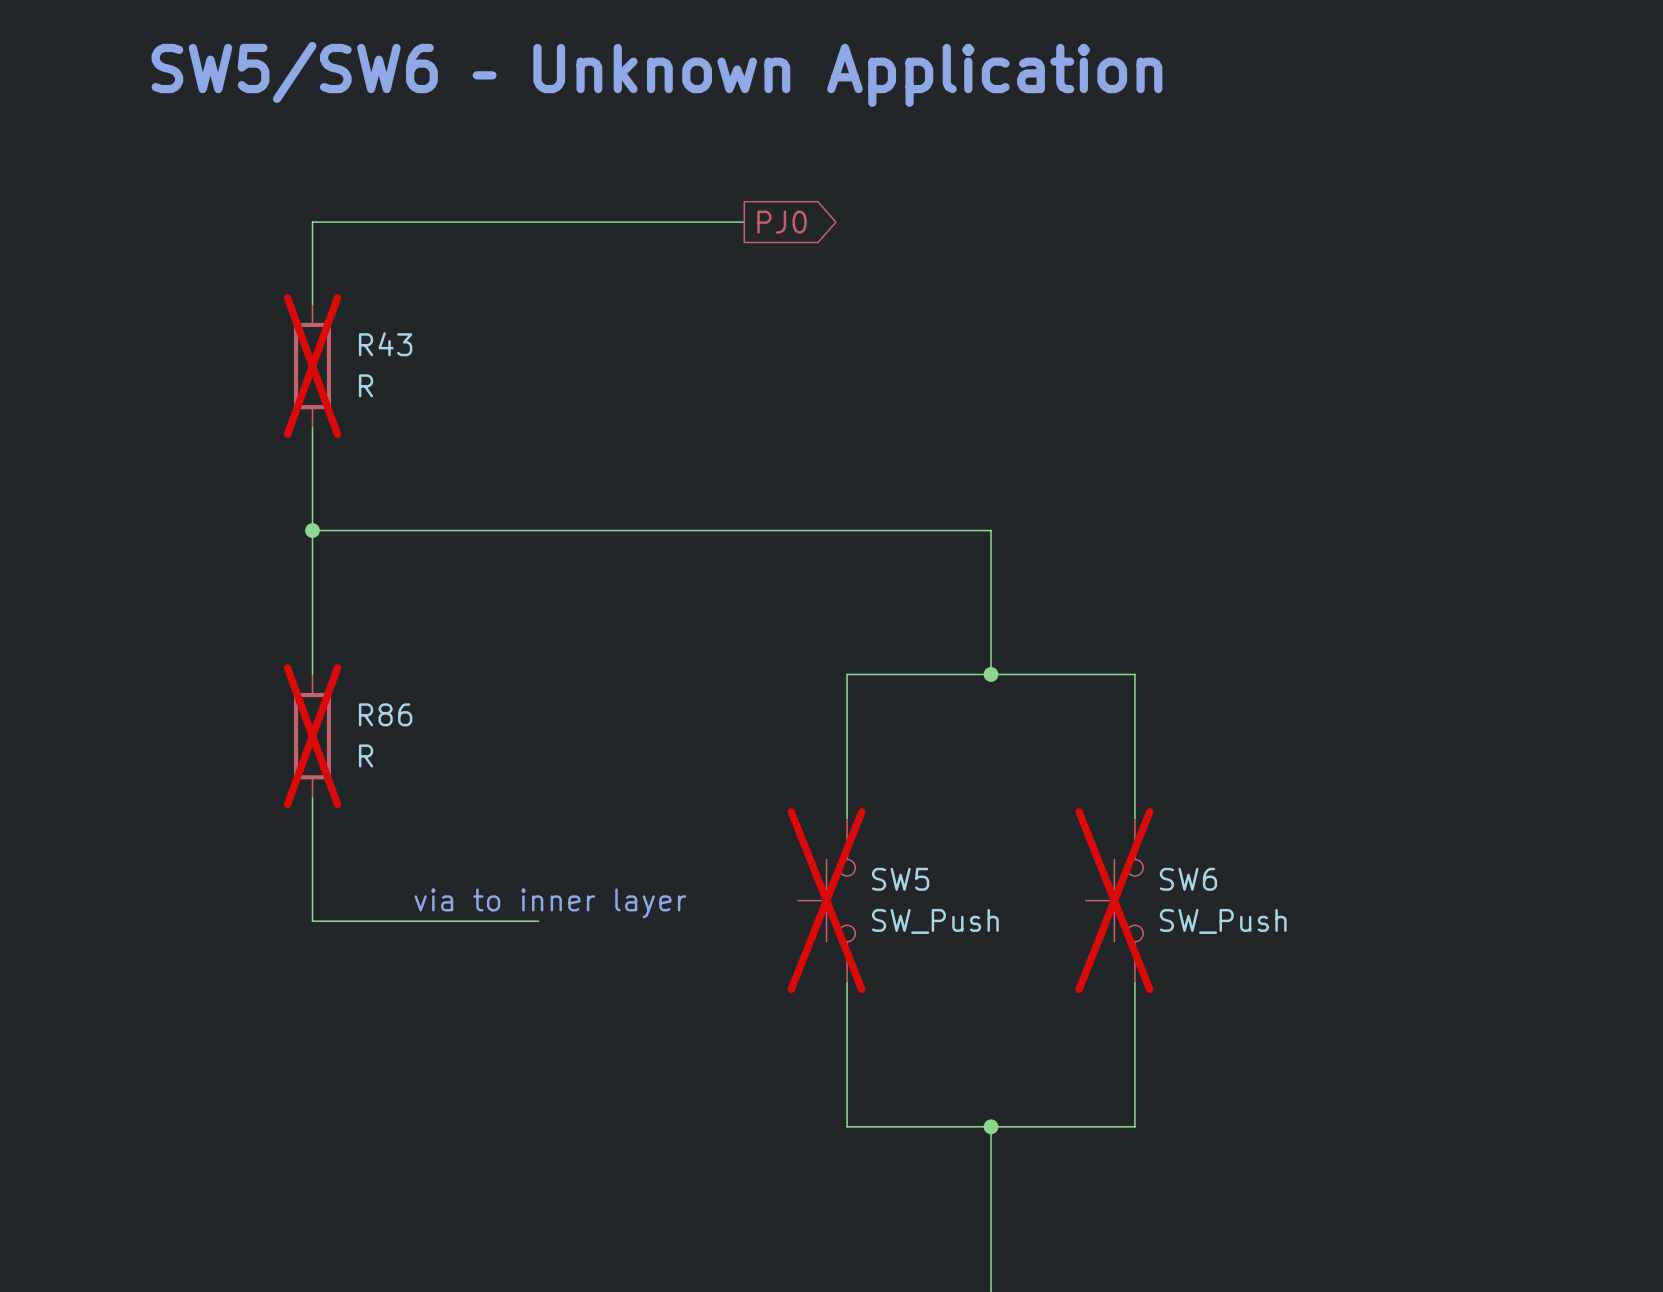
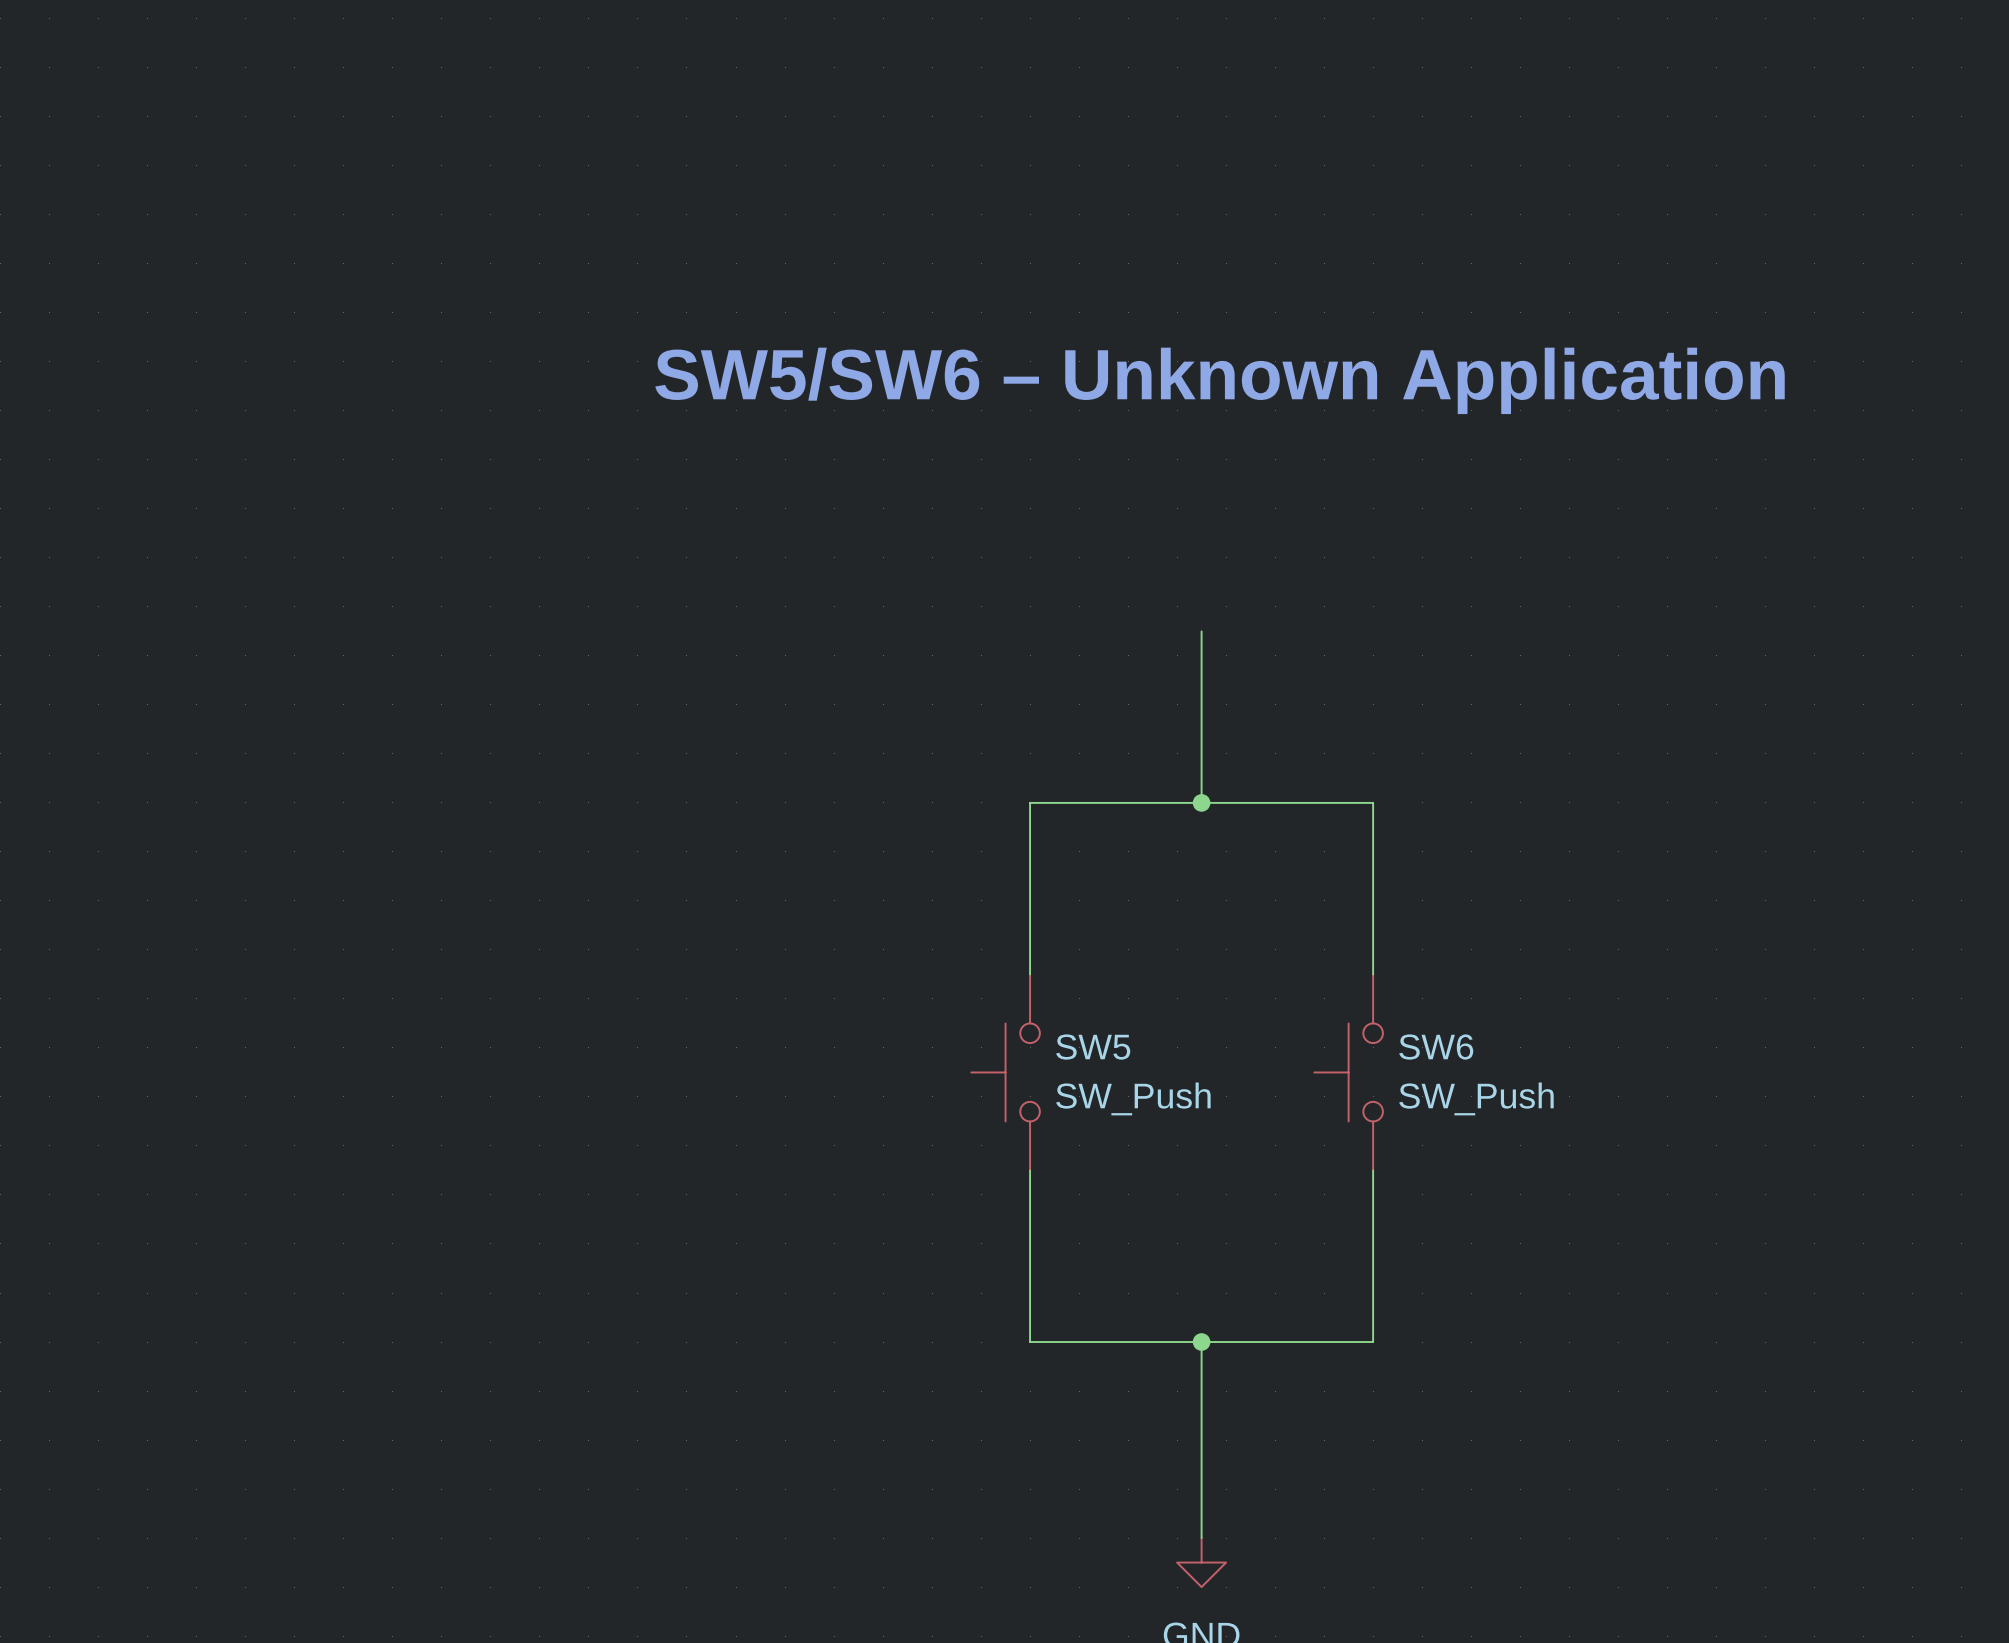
text: SW5/SW6 – Unknown Application (656, 74) -> none
wire: (744, 222) (312, 222) (312, 304) -> none
global label: PJ0 (782, 222) -> none
text: none -> SW5/SW6 – Unknown Application (1220, 380)
R43: R (312, 366) -> none
wire: (312, 427) (312, 674) -> none
wire: (312, 530) (991, 530) -> none
junction: (312, 530) -> none
R86: R (312, 736) -> none
wire: (312, 797) (312, 921) (538, 921) -> none
SW5 do-not-place cross: (826, 900) -> none
SW6 do-not-place cross: (1114, 900) -> none
text: via to inner layer (550, 903) -> none

